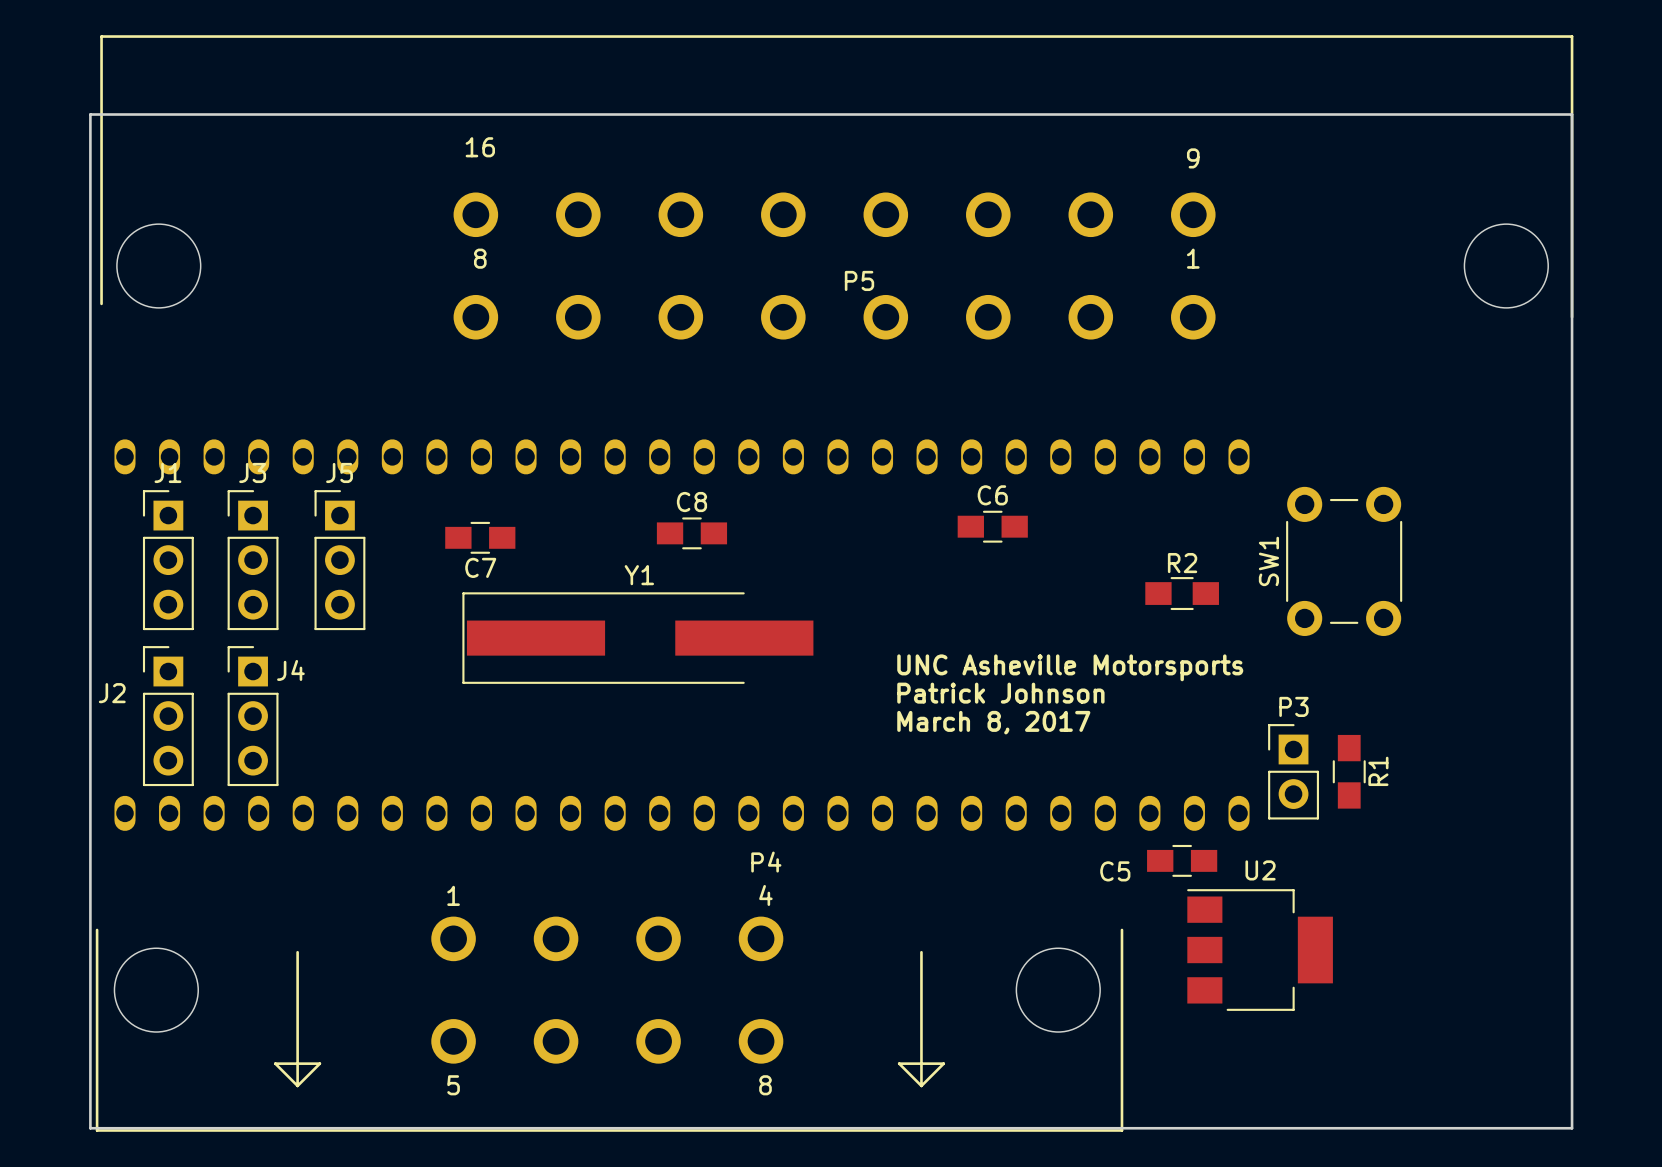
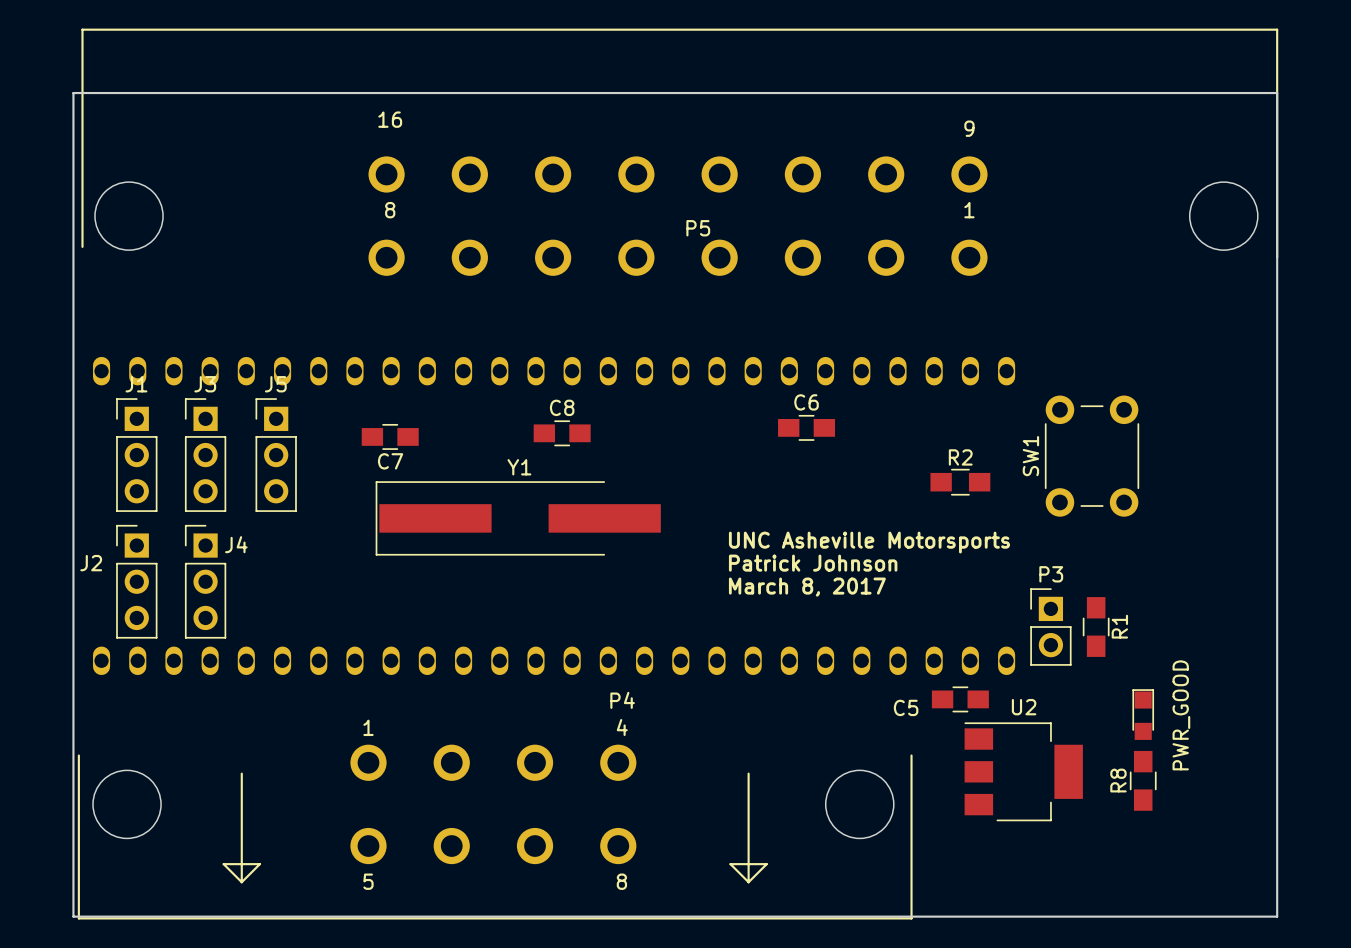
PWR_GOOD: none -> (1143, 714)
R8: none -> (1143, 780)

